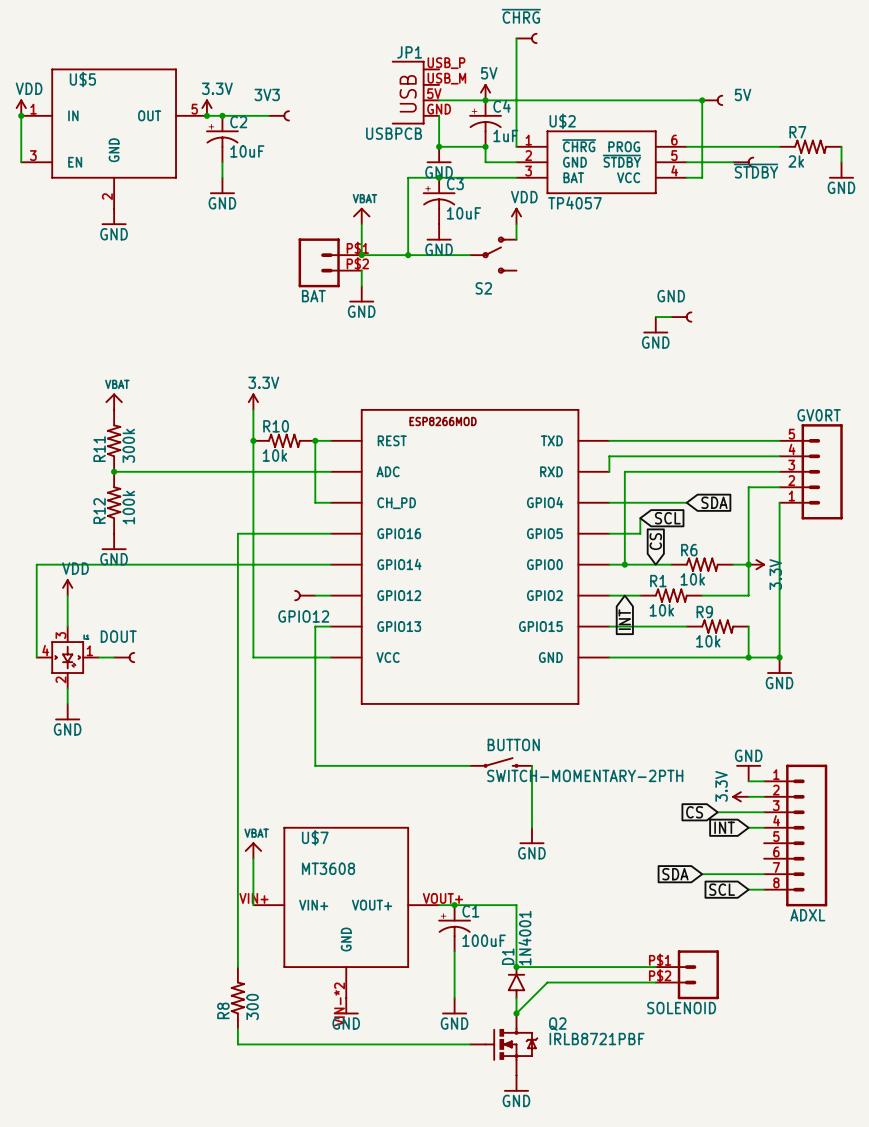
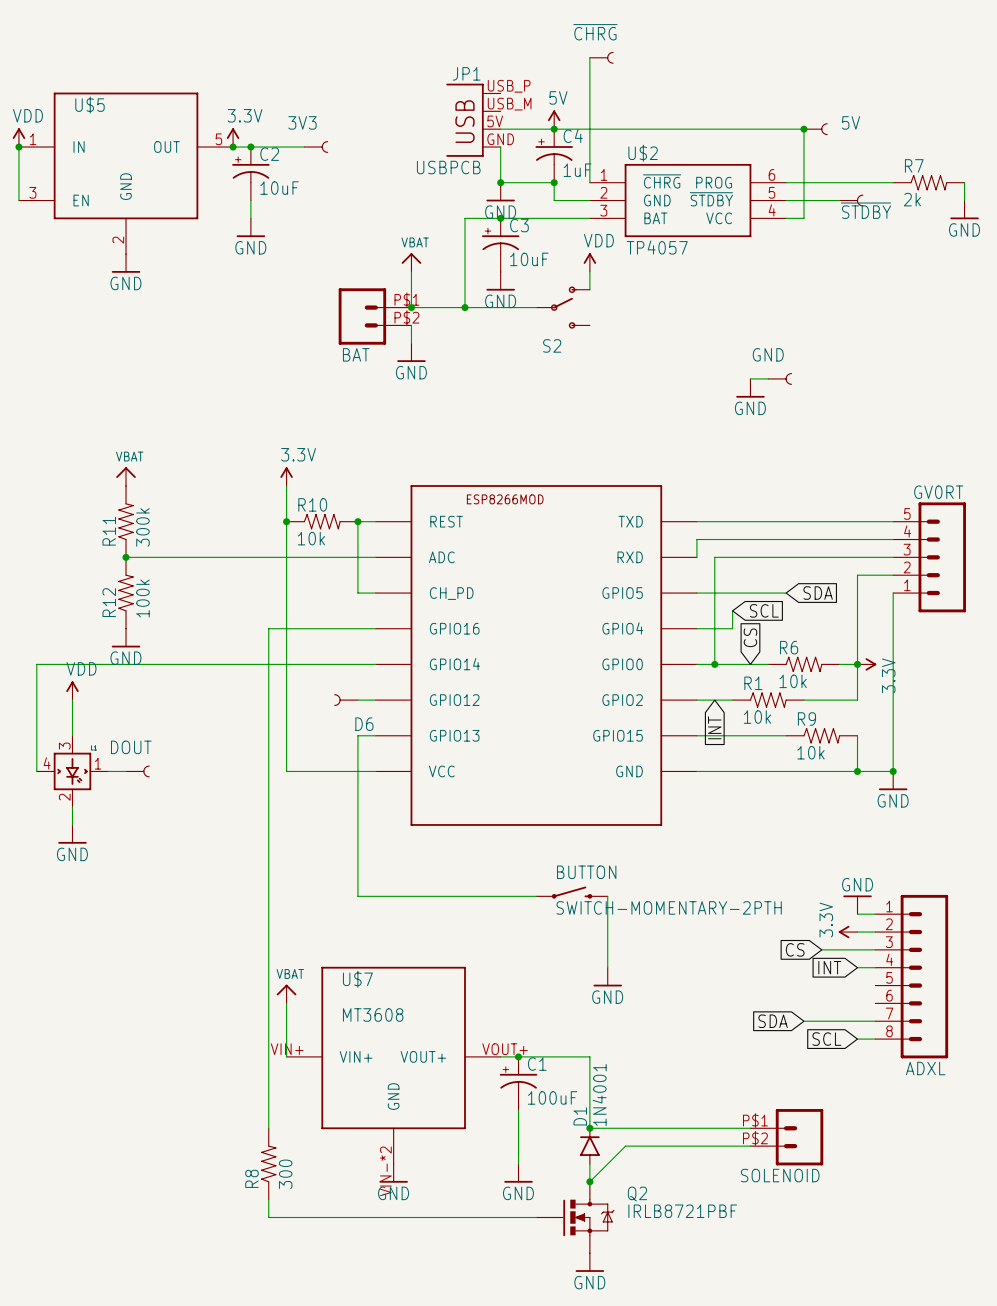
ESP8266MOD pin name: GPIO4 (545, 502) -> GPIO5 (622, 593)
ESP8266MOD pin name: GPIO5 (544, 533) -> GPIO4 (622, 628)
GPIO12 name: GPIO12 (303, 616) -> D6 (364, 724)

